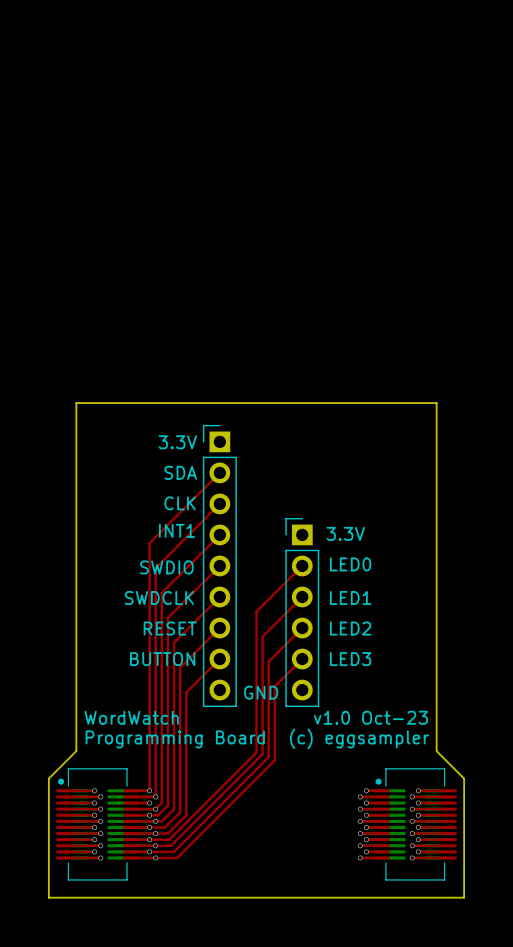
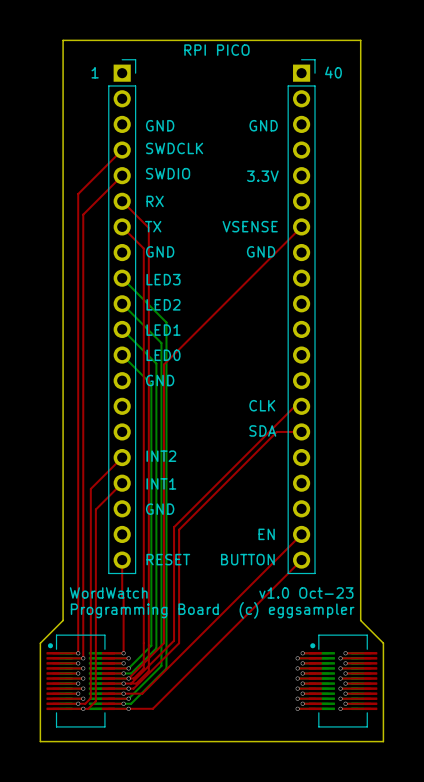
text: none -> RPI PICO (216, 50)
text: none -> 40 (333, 72)
text: none -> 1 (95, 72)
text: none -> GND (160, 125)
text: none -> GND (263, 125)
text: none -> SWDCLK (174, 148)
top track: none -> (122, 150) (78, 194) (78, 653)
text: none -> SWDIO (168, 173)
top track: none -> (122, 175) (83, 214) (83, 658)
text: none -> 3.3V (262, 176)
text: none -> RX (155, 201)
text: none -> TX (153, 226)
text: none -> VSENSE (250, 226)
top track: none -> (301, 226) (163, 364) (163, 643) (128, 678)
text: none -> GND (160, 251)
text: none -> GND (261, 251)
bottom track: none -> (122, 278) (166, 322) (166, 668) (131, 703) (123, 703)
text: none -> LED3 (163, 279)
bottom track: none -> (122, 303) (161, 343) (161, 665) (128, 698)
part: none -> (122, 316)
part: none -> (301, 316)
bottom track: none -> (122, 329) (156, 363) (156, 648) (131, 673) (123, 673)
board edge: (76, 403) (436, 403) -> (63, 332) (63, 40) (360, 40) (360, 332)
bottom track: none -> (122, 355) (151, 384) (151, 645) (128, 668)
text: 3.3V (177, 442) -> none
text: none -> GND (160, 380)
text position: SDA (180, 472) -> SDA (262, 430)
top track: (219, 472) (149, 543) (149, 723) -> (122, 560) (123, 597)
top track: none -> (301, 406) (294, 406) (174, 527) (174, 640) (131, 683)
text position: CLK (180, 503) -> CLK (262, 405)
top track: (219, 503) (155, 568) (155, 796) -> none
text position: INT1 (177, 530) -> INT1 (161, 483)
text: 3.3V (345, 533) -> none
top track: (219, 534) (161, 592) (161, 803) (155, 809) -> none
text: none -> INT2 (161, 456)
top track: none -> (122, 457) (90, 488) (90, 698) (85, 703) (78, 703)
text position: LED0 (350, 564) -> LED0 (163, 355)
top track: (219, 565) (167, 617) (167, 805) (158, 815) (149, 815) -> none
part: (219, 565) -> none
top track: (302, 565) (256, 611) (256, 752) (169, 839) -> (301, 534) (142, 693) (139, 693)
text: SWDIO (166, 567) -> none
top track: none -> (122, 483) (95, 509) (95, 701) (88, 708) (83, 708)
top track: (219, 596) (174, 642) -> (122, 226) (143, 248) (143, 531)
top track: (302, 596) (262, 636) (262, 754) (171, 845) (155, 845) -> none
text: SWDCLK (159, 598) -> none
text position: LED1 (350, 598) -> LED1 (163, 330)
part: (302, 612) -> none
text: none -> GND (160, 509)
text position: RESET (170, 628) -> RESET (168, 559)
top track: (219, 628) (180, 667) -> (122, 201) (148, 227) (148, 551)
top track: (302, 628) (268, 661) (268, 757) (174, 851) (149, 851) -> none
text position: LED2 (350, 628) -> LED2 (163, 304)
text: none -> EN (266, 534)
text position: BUTTON (162, 659) -> BUTTON (247, 559)
top track: (219, 659) (186, 692) (186, 815) (167, 833) (161, 833) -> (301, 431) (276, 431) (179, 529) (179, 643) (133, 688)
top track: (302, 659) (274, 686) (274, 760) (177, 857) -> (301, 560) (152, 708) (146, 708)
text: LED3 (350, 659) -> none
text: GND (261, 692) -> none

